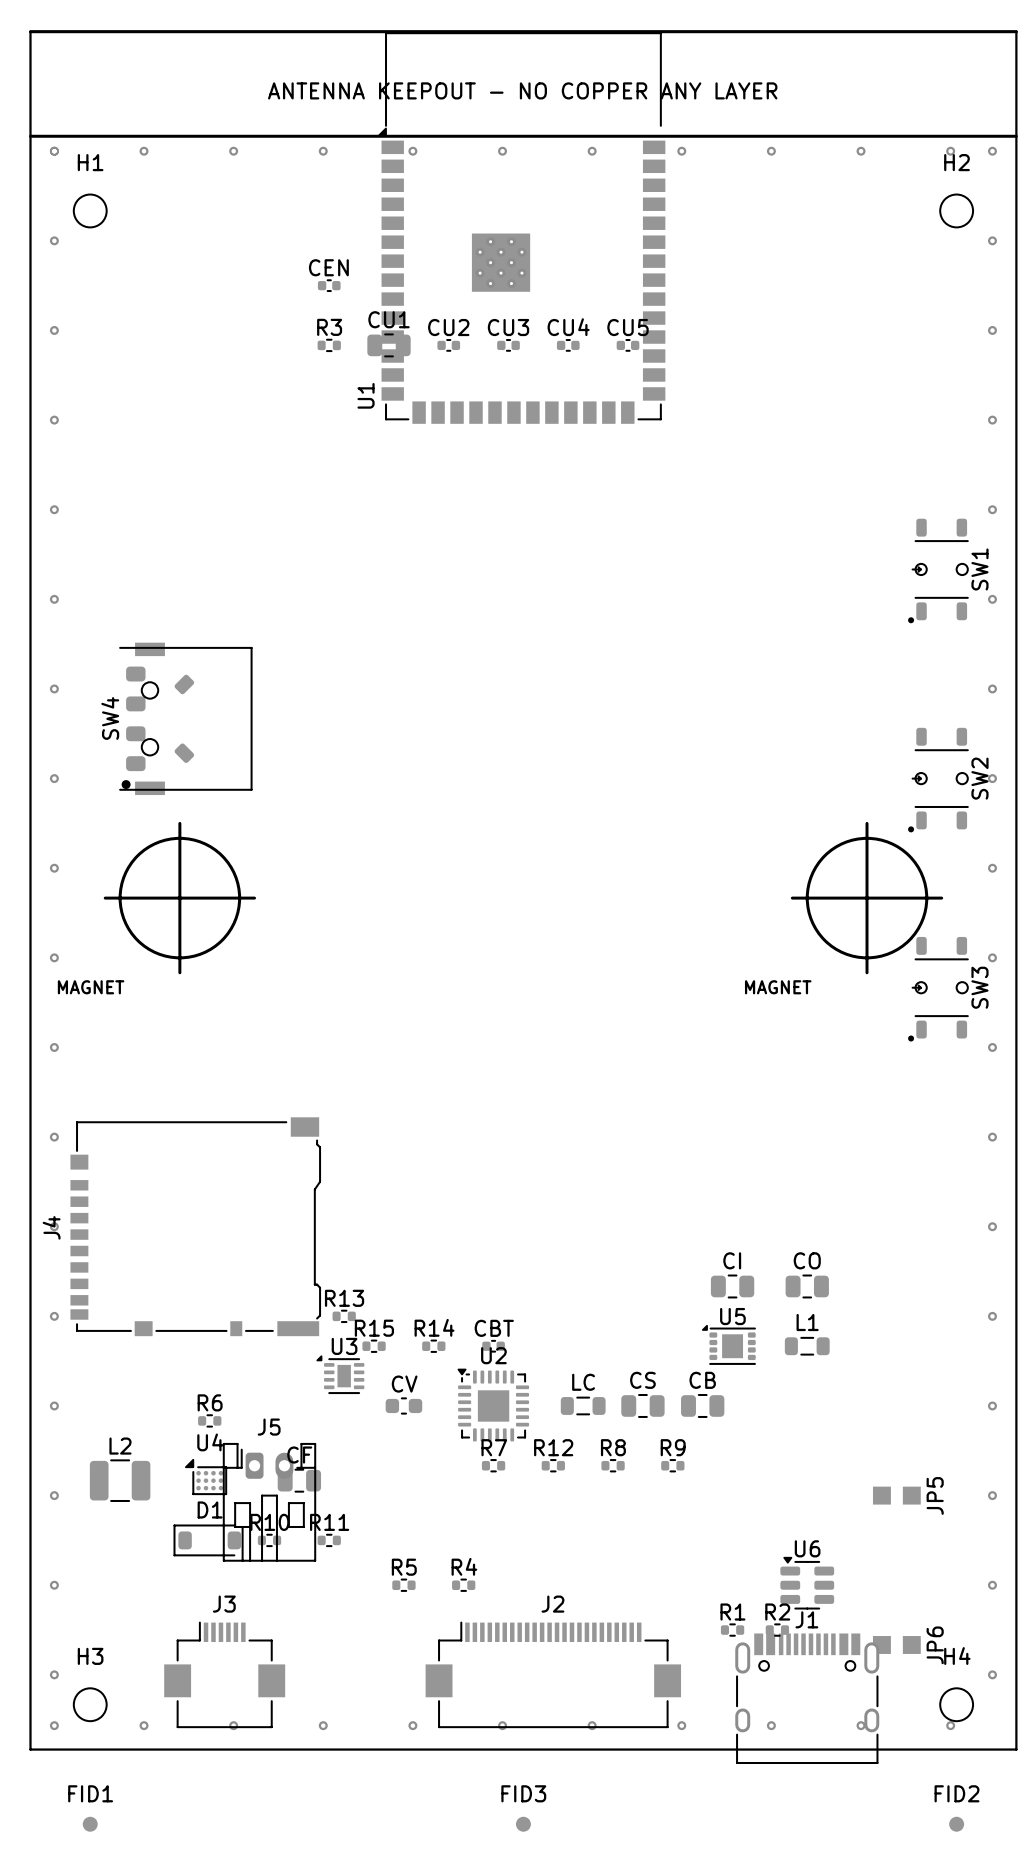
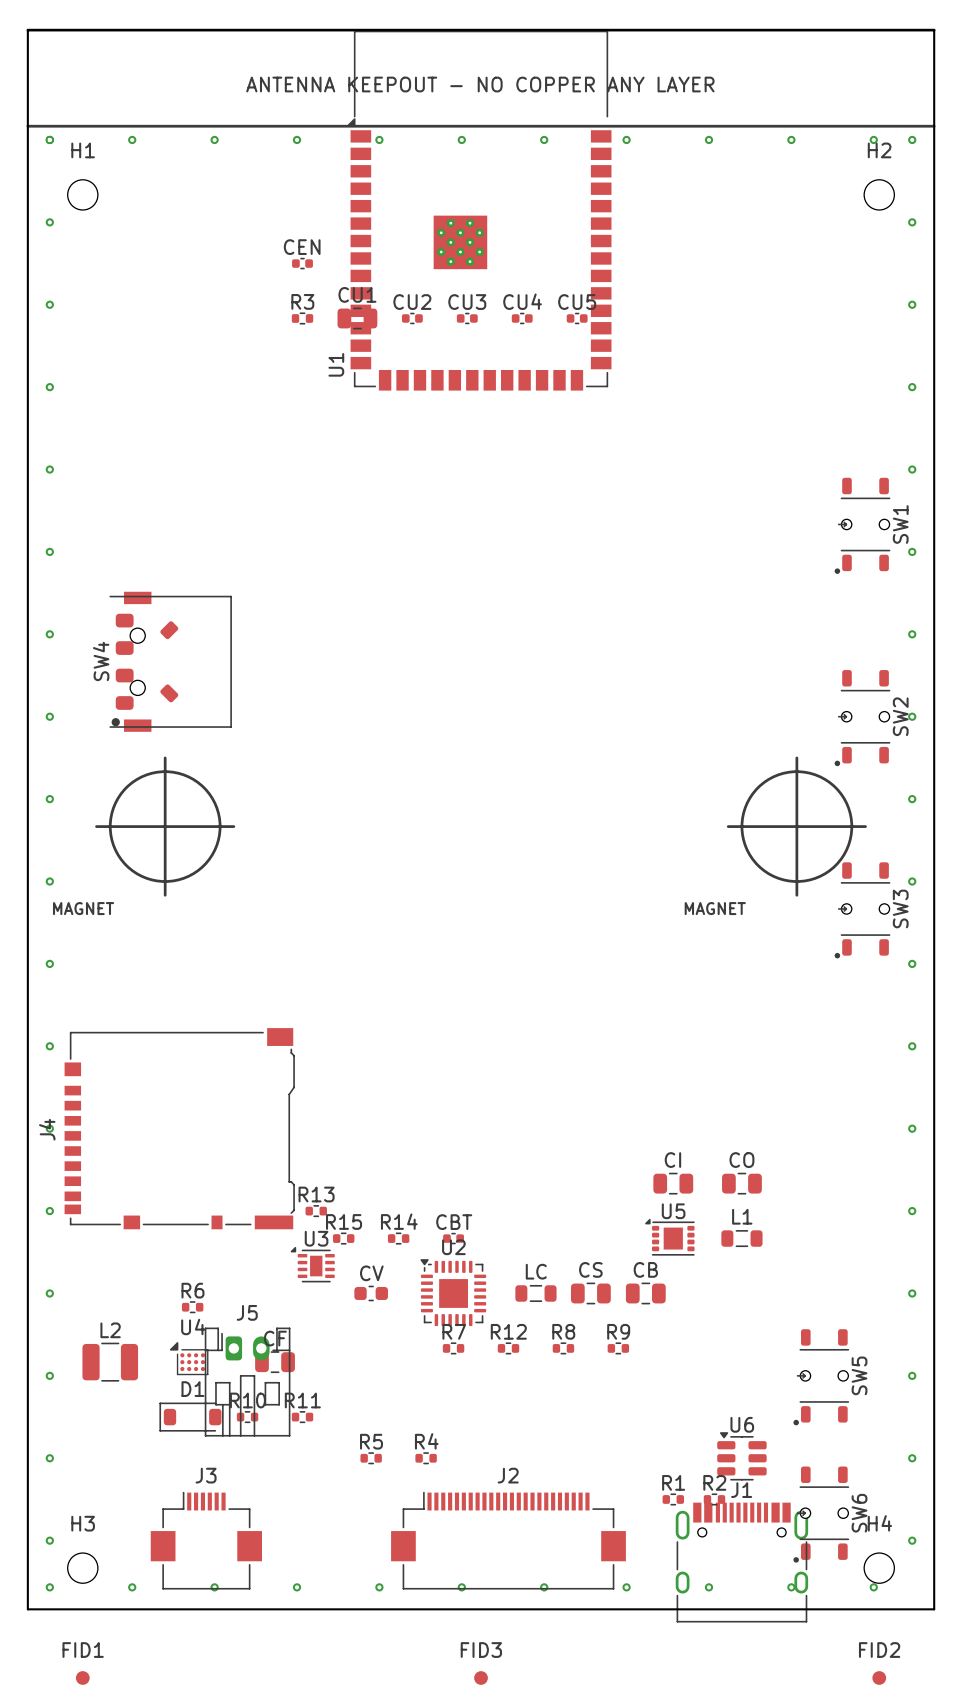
JP5: (896, 1495) -> none
SW5: none -> (821, 1377)
JP6: (896, 1644) -> none
SW6: none -> (821, 1514)

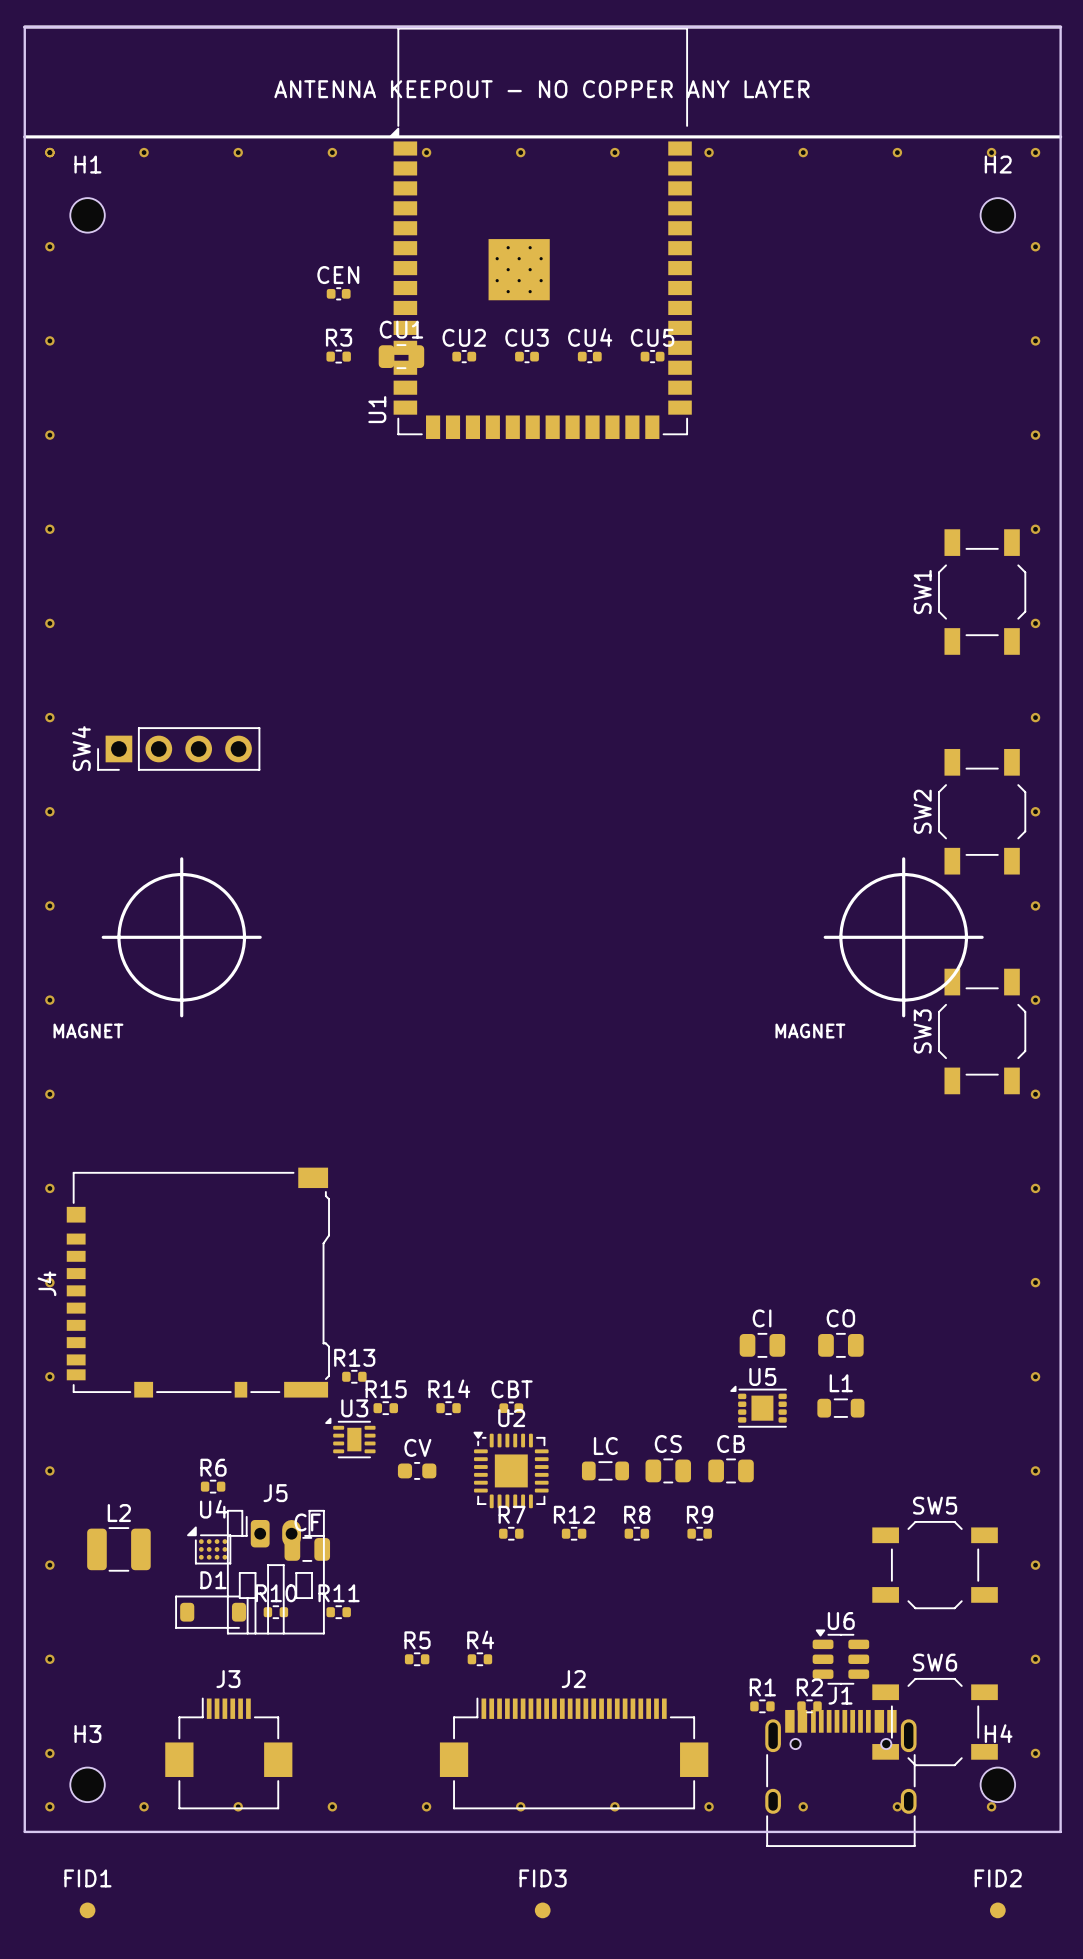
SW1 footprint: [834, 477, 891, 574] -> [938, 529, 1027, 655]
SW1 name position: SW1 (900, 524) -> SW1 (922, 592)
SW4 footprint: [109, 591, 232, 732] -> [97, 727, 261, 771]
SW2 footprint: [834, 670, 891, 767] -> [938, 748, 1027, 875]
SW2 name position: SW2 (900, 716) -> SW2 (922, 811)
SW3 footprint: [834, 862, 891, 959] -> [938, 968, 1027, 1095]
SW3 name position: SW3 (900, 908) -> SW3 (922, 1031)
SW5 footprint: [793, 1329, 850, 1426] -> [872, 1521, 998, 1610]
SW5 name position: SW5 (859, 1375) -> SW5 (935, 1505)
SW6 footprint: [793, 1466, 850, 1563] -> [872, 1677, 998, 1767]
SW6 name position: SW6 (859, 1513) -> SW6 (935, 1662)

